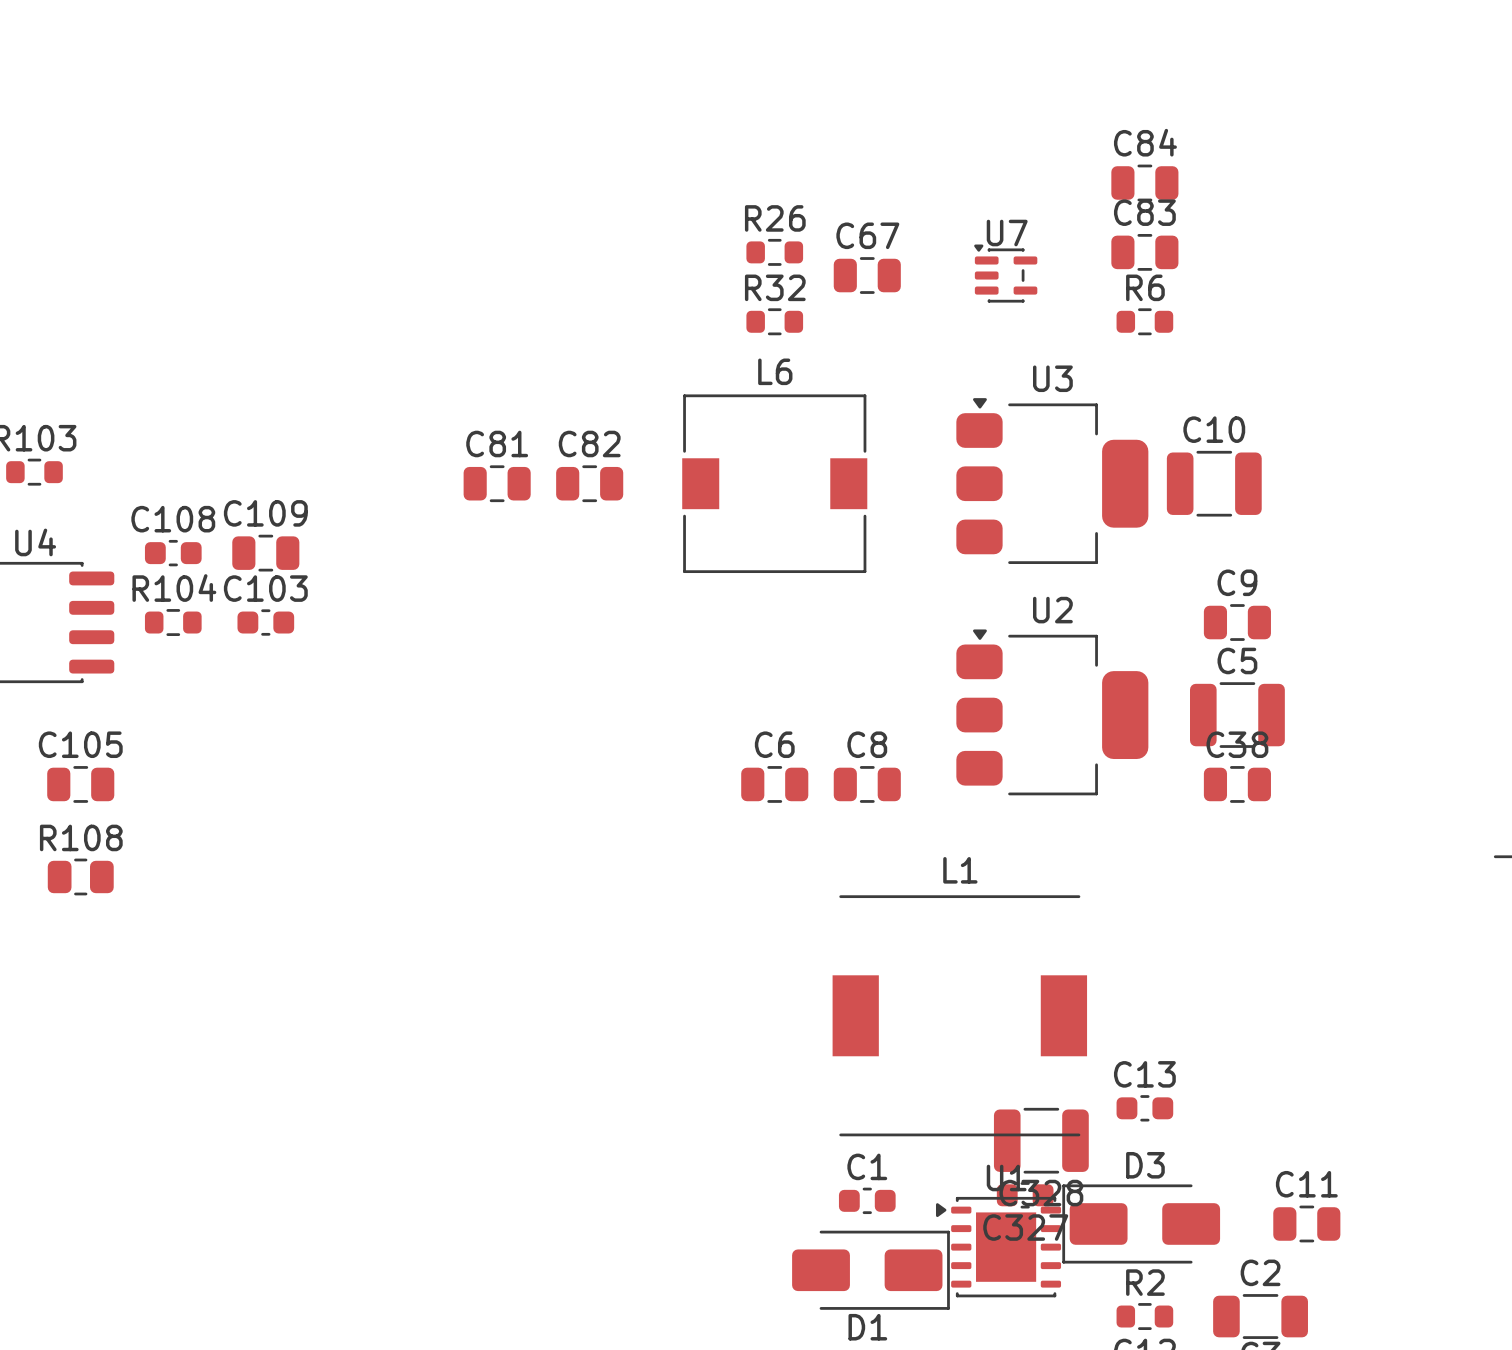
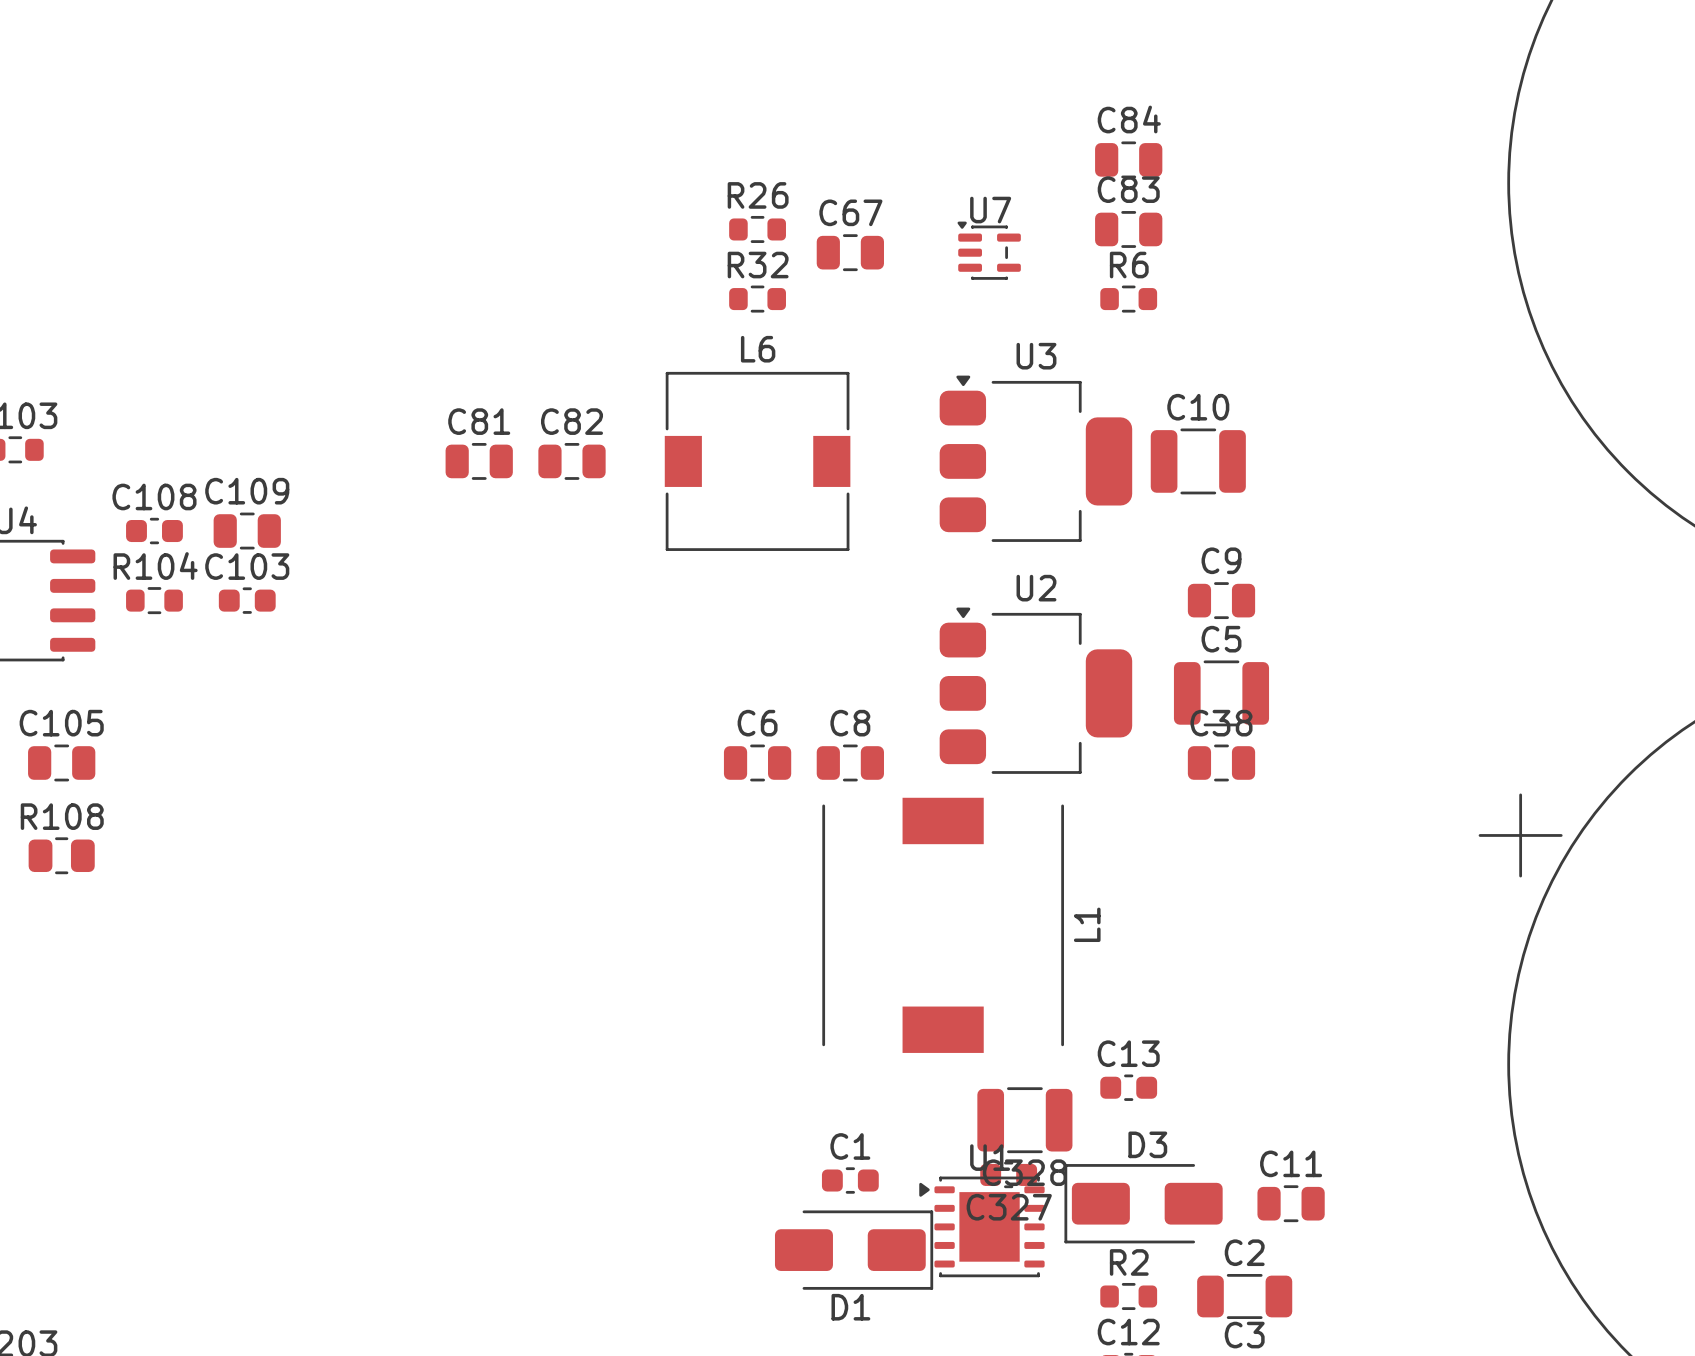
L1 rotation: 0° (959, 1015) -> 90° clockwise (943, 925)
D3 position: (1141, 1223) -> (1143, 1203)

